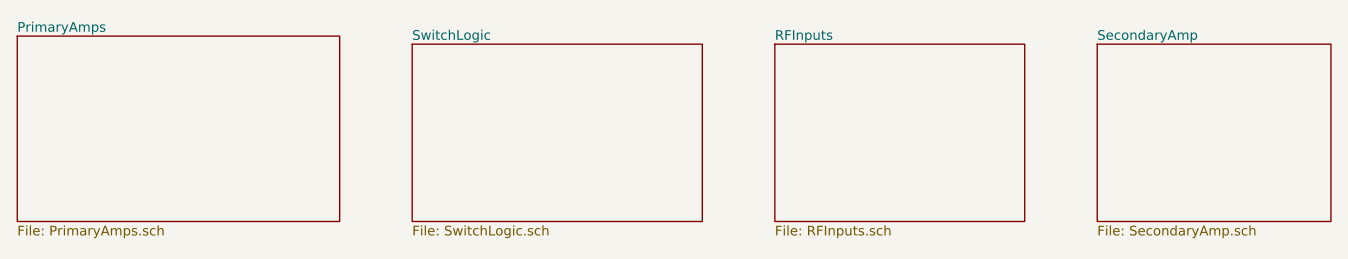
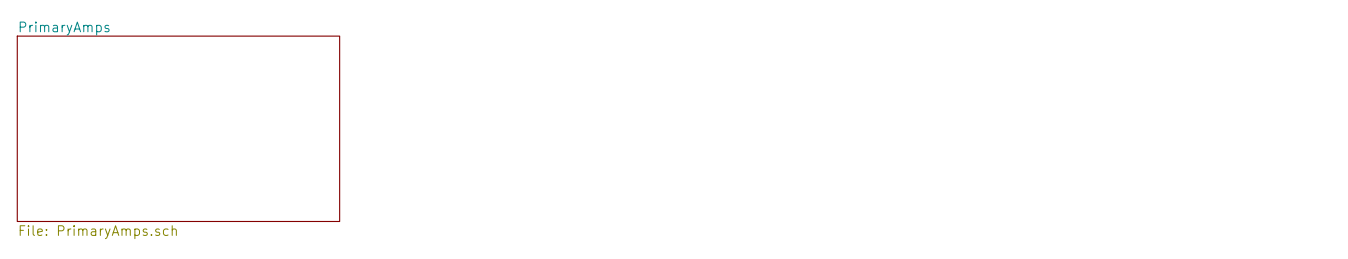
sheet SwitchLogic: File: SwitchLogic.sch (557, 132) -> none
sheet RFInputs: File: RFInputs.sch (899, 132) -> none
sheet SecondaryAmp: File: SecondaryAmp.sch (1214, 132) -> none

